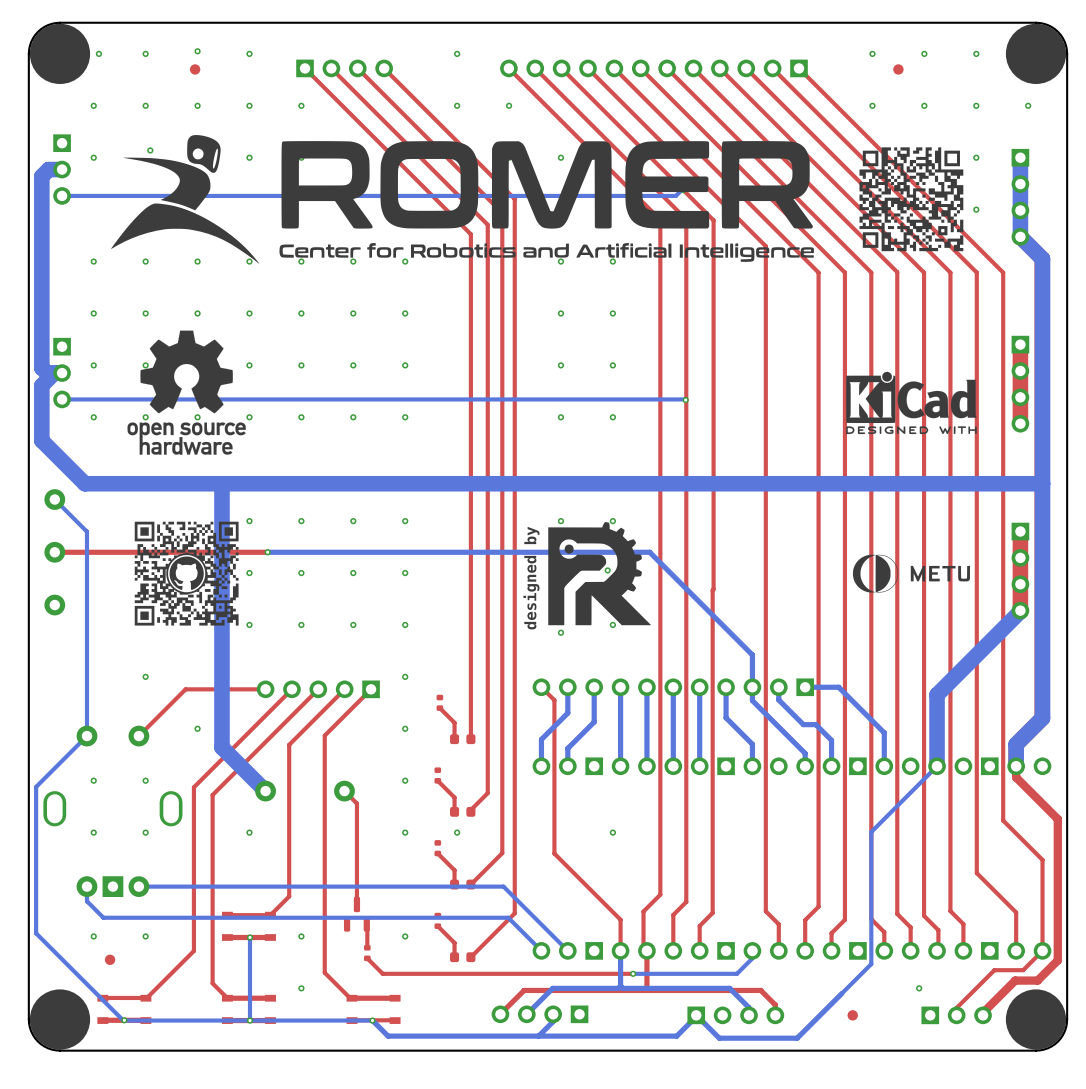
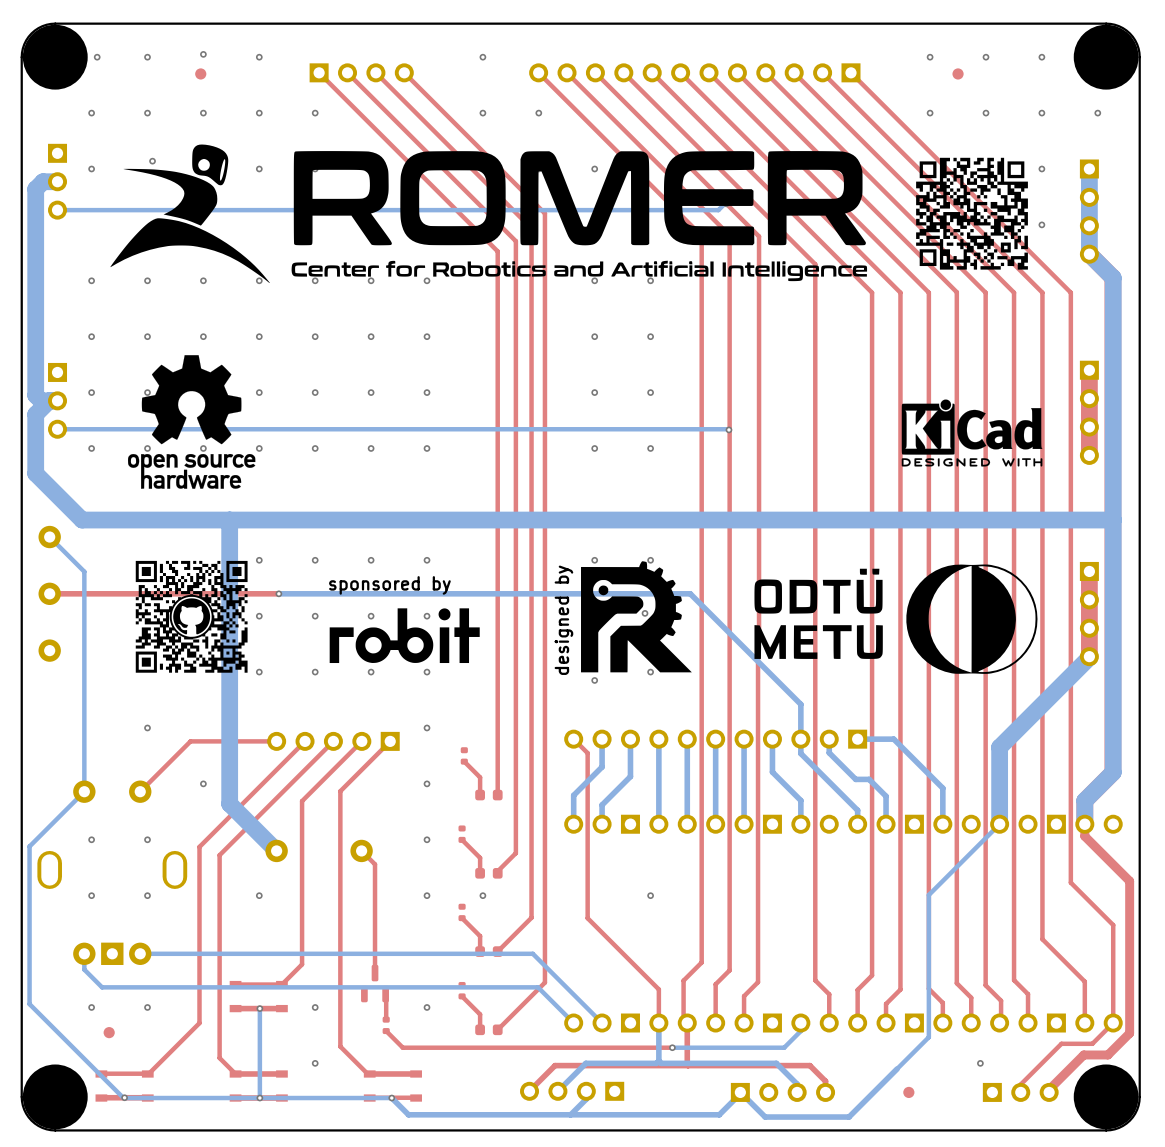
drawing: none -> [754, 564, 1038, 674]
text: none -> sponsored by (389, 585)
drawing: [852, 554, 970, 593] -> none
drawing: none -> [329, 608, 480, 664]

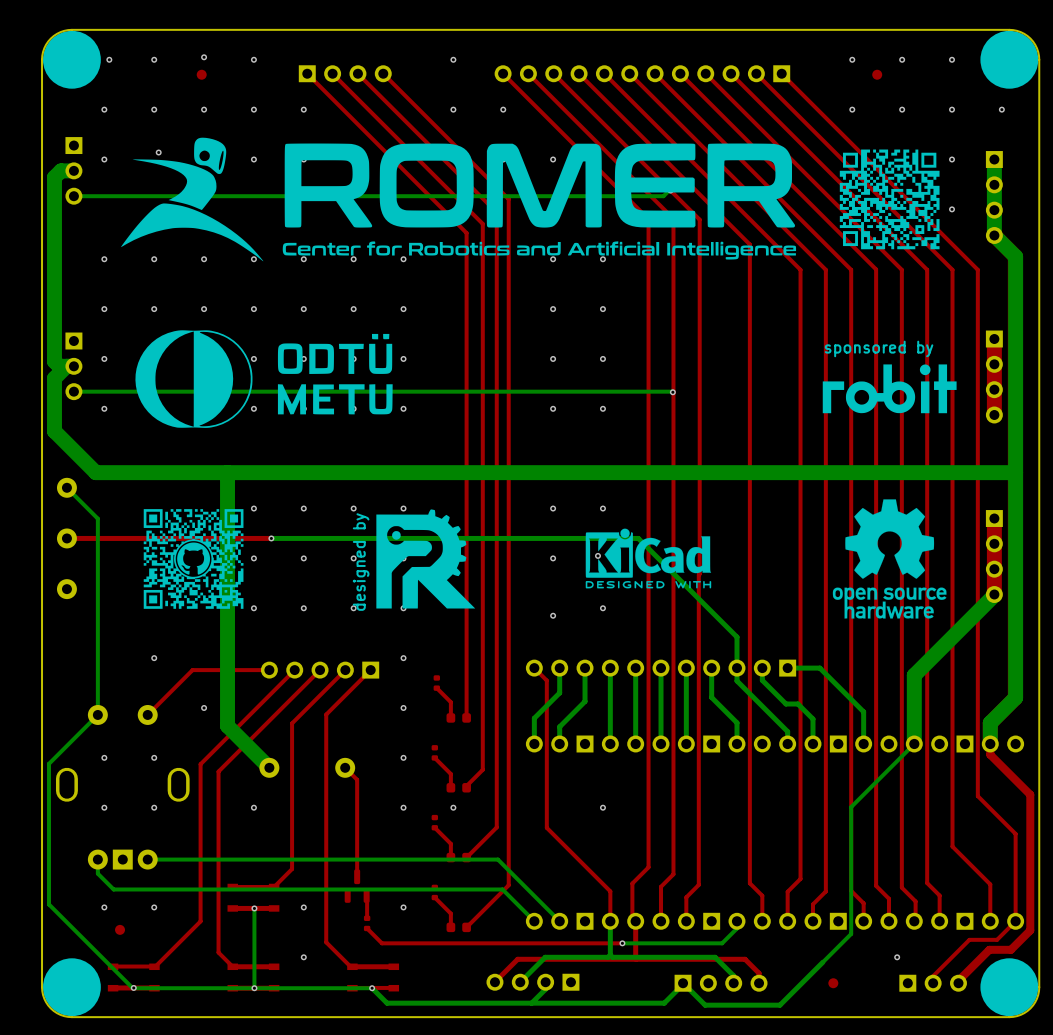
drawing: [127, 355, 256, 489] -> none
drawing: none -> [135, 330, 393, 428]
text: none -> sponsored by (879, 348)
drawing shape: [901, 399, 1043, 467] -> [822, 364, 957, 414]
drawing: none -> [832, 499, 947, 619]
drawing: [754, 564, 1038, 674] -> none
drawing: none -> [585, 528, 712, 589]
text: sponsored by (389, 585) -> none
drawing: [329, 608, 480, 664] -> none
drawing position: (636, 616) -> (425, 558)
text position: designed by (563, 620) -> designed by (361, 562)

